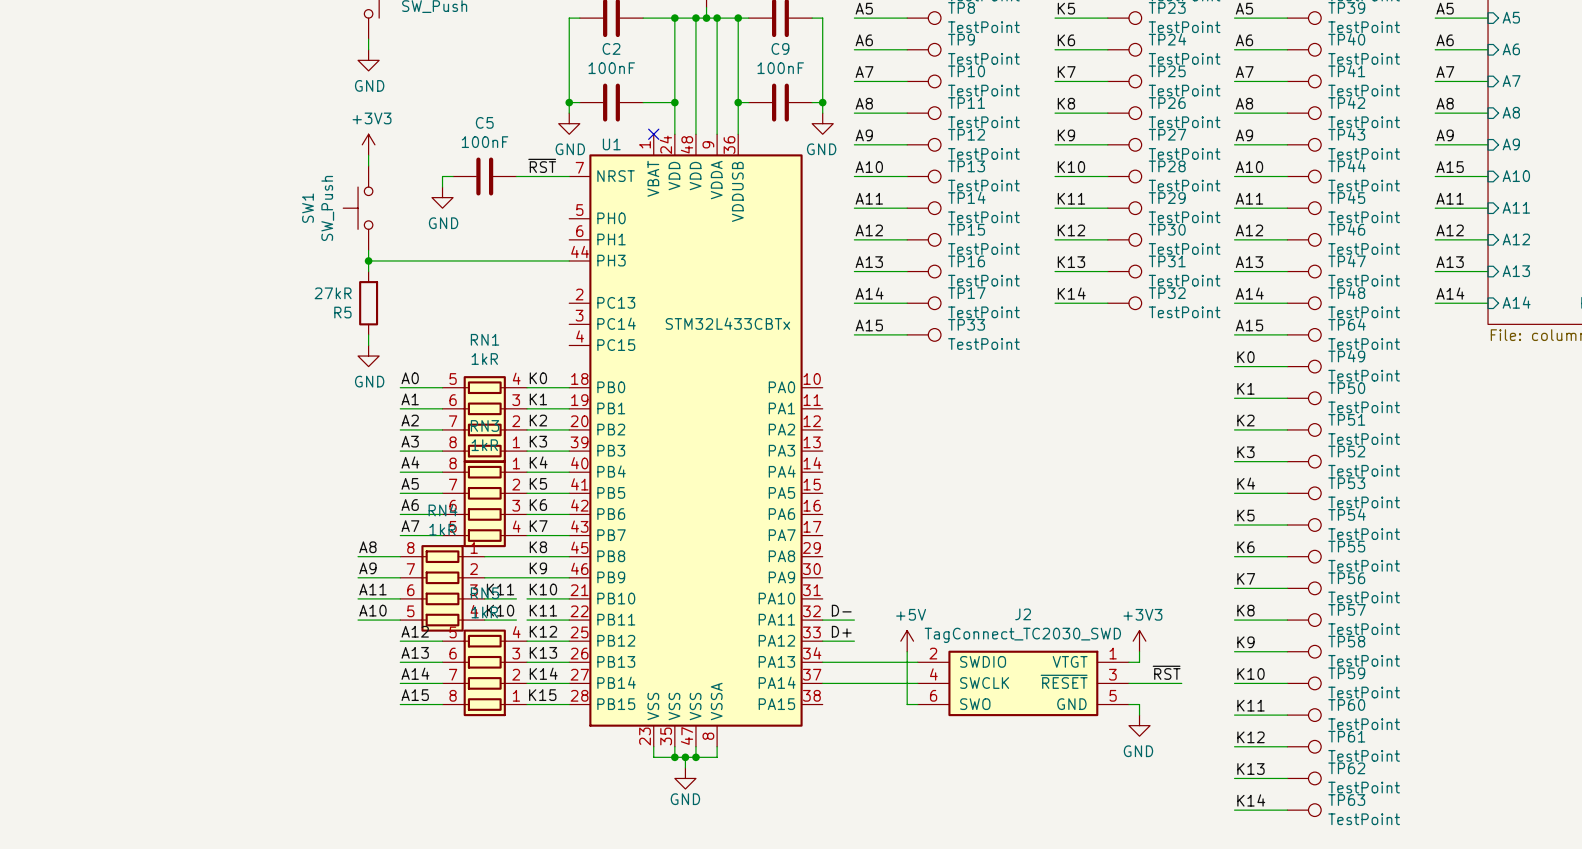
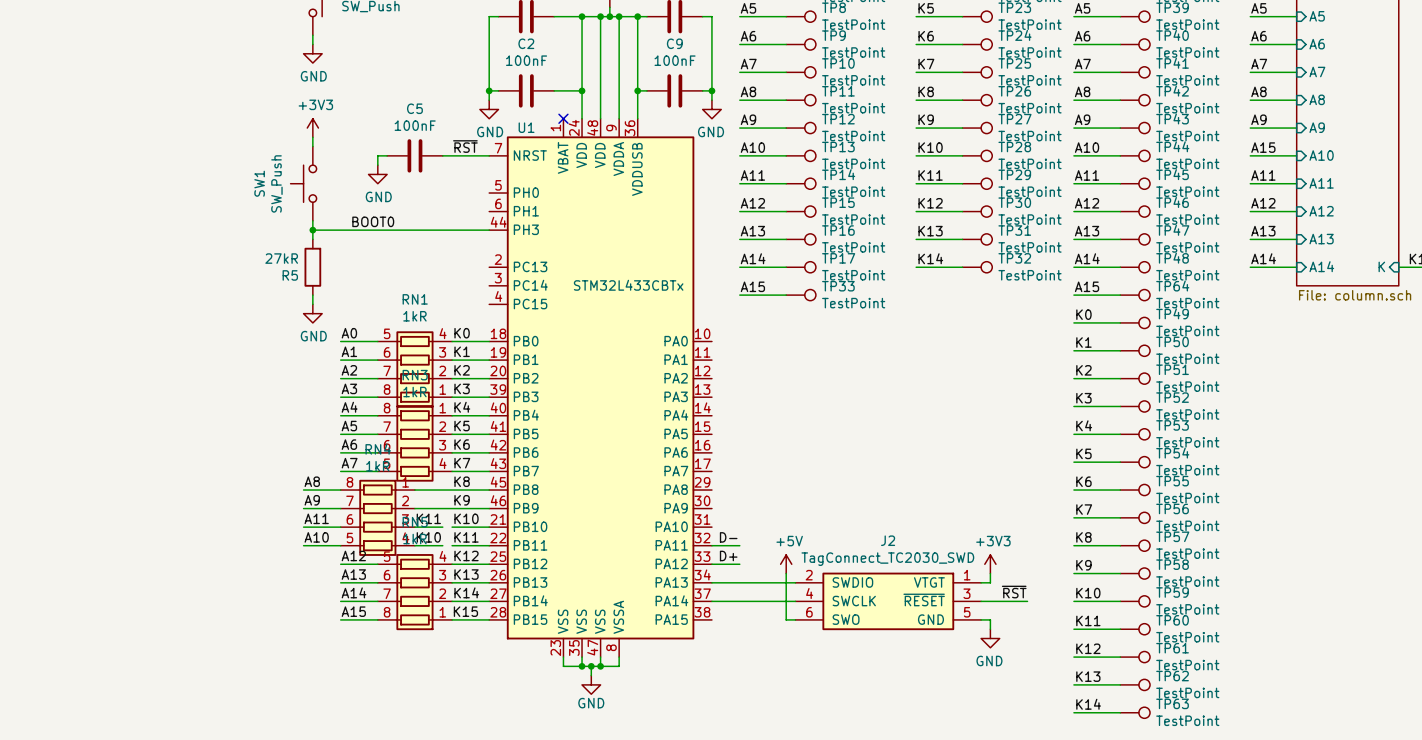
label: none -> BOOT0 (373, 221)

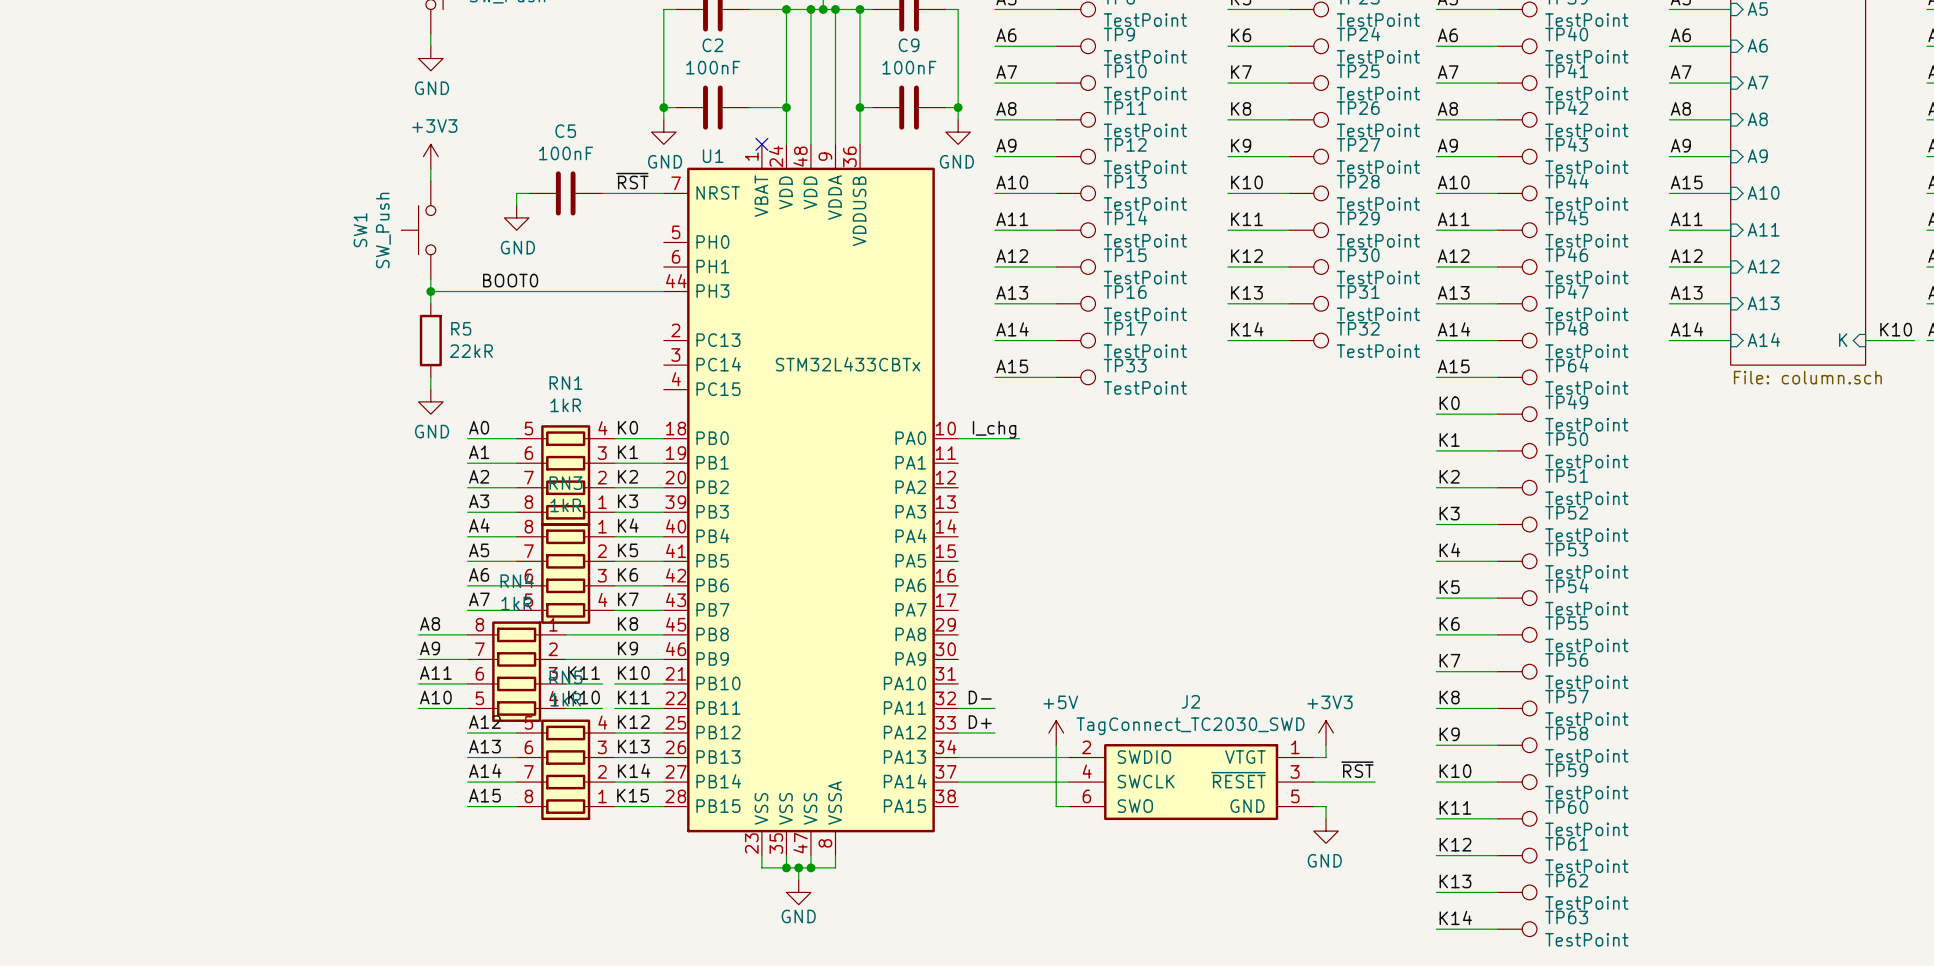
R5 value: 27kR (281, 258) -> 22kR (471, 351)
R5 name position: R5 (290, 275) -> R5 (461, 328)
label: none -> I_chg (994, 429)
wire: none -> (958, 438) (1019, 438)

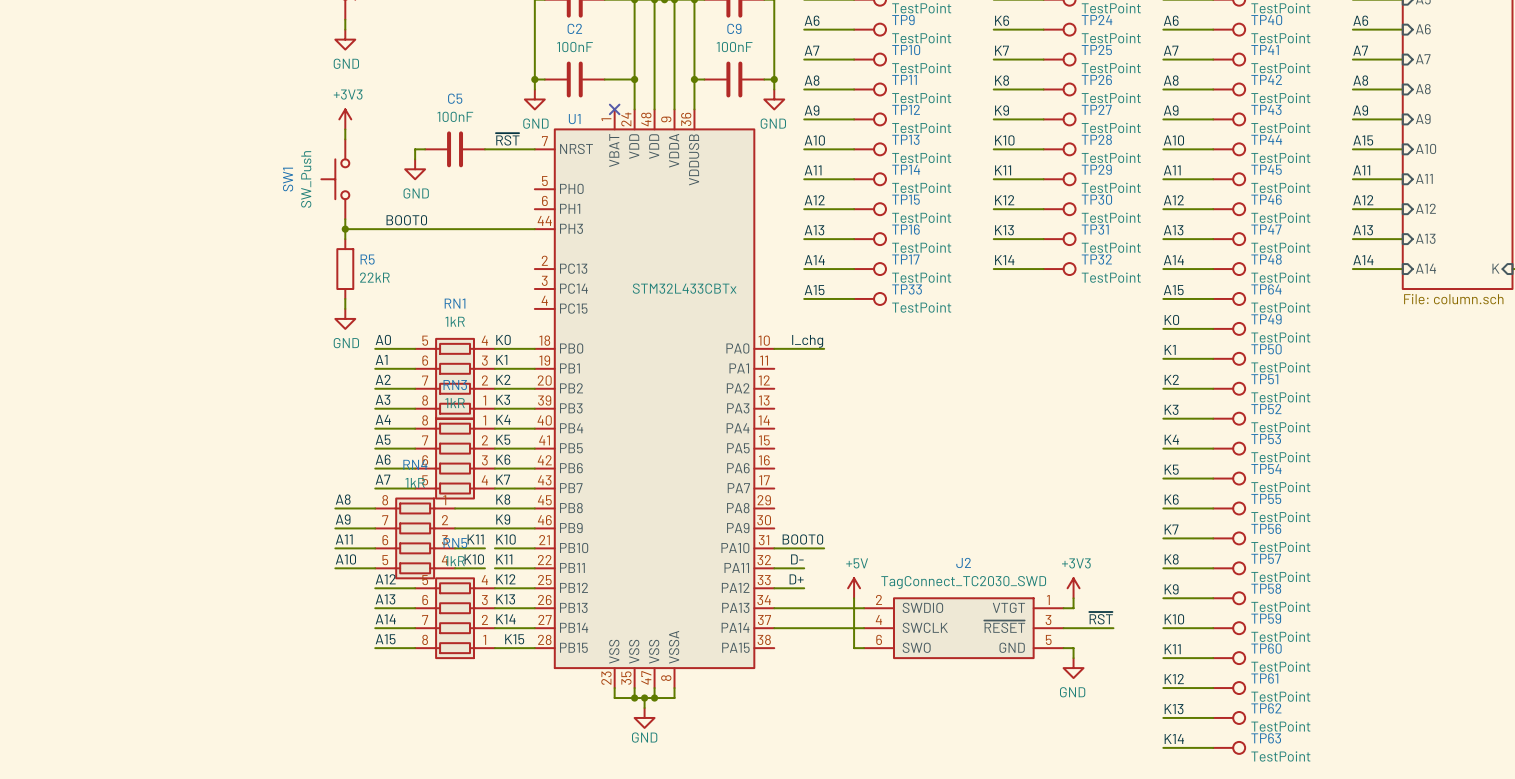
label: none -> BOOT0 (802, 539)
wire: none -> (774, 548) (824, 548)

